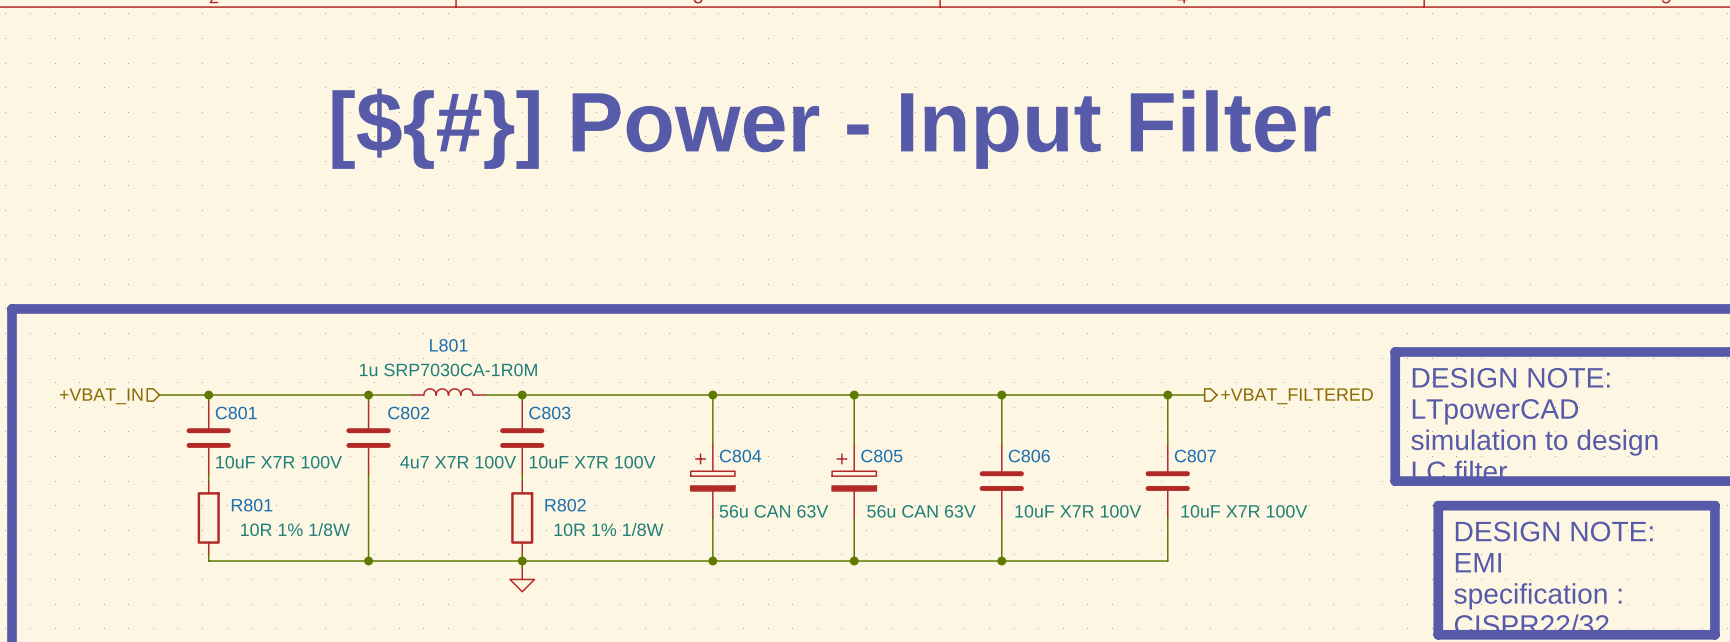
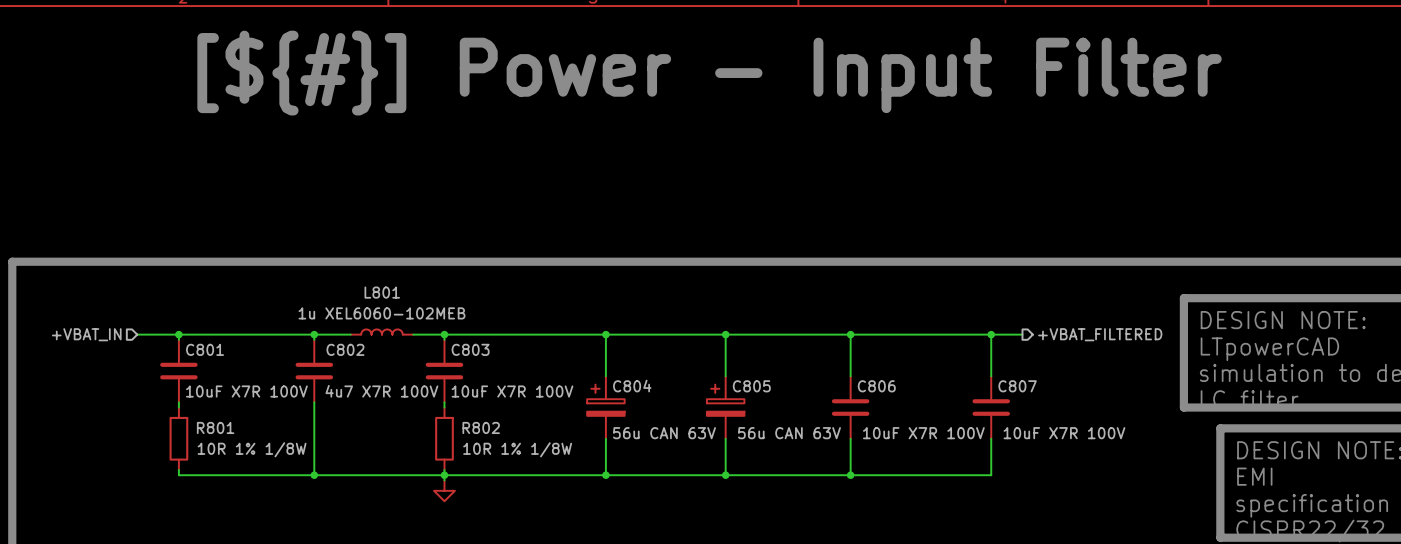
text position: [${#}] Power - Input Filter (831, 128) -> [${#}] Power - Input Filter (709, 73)
L801 value: 1u SRP7030CA-1R0M (448, 369) -> 1u XEL6060-102MEB (381, 313)

